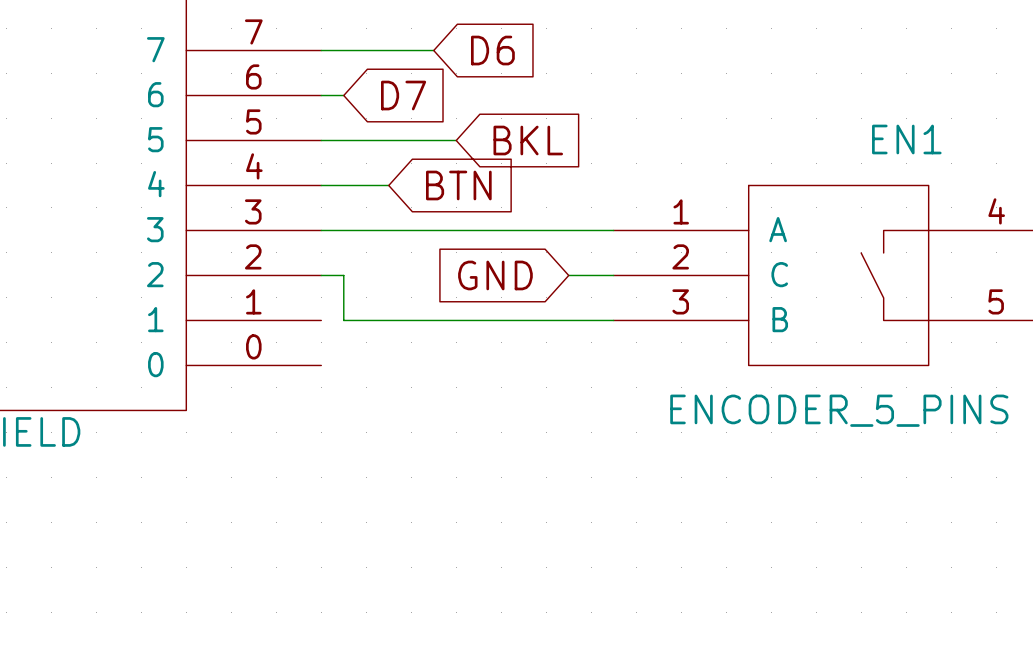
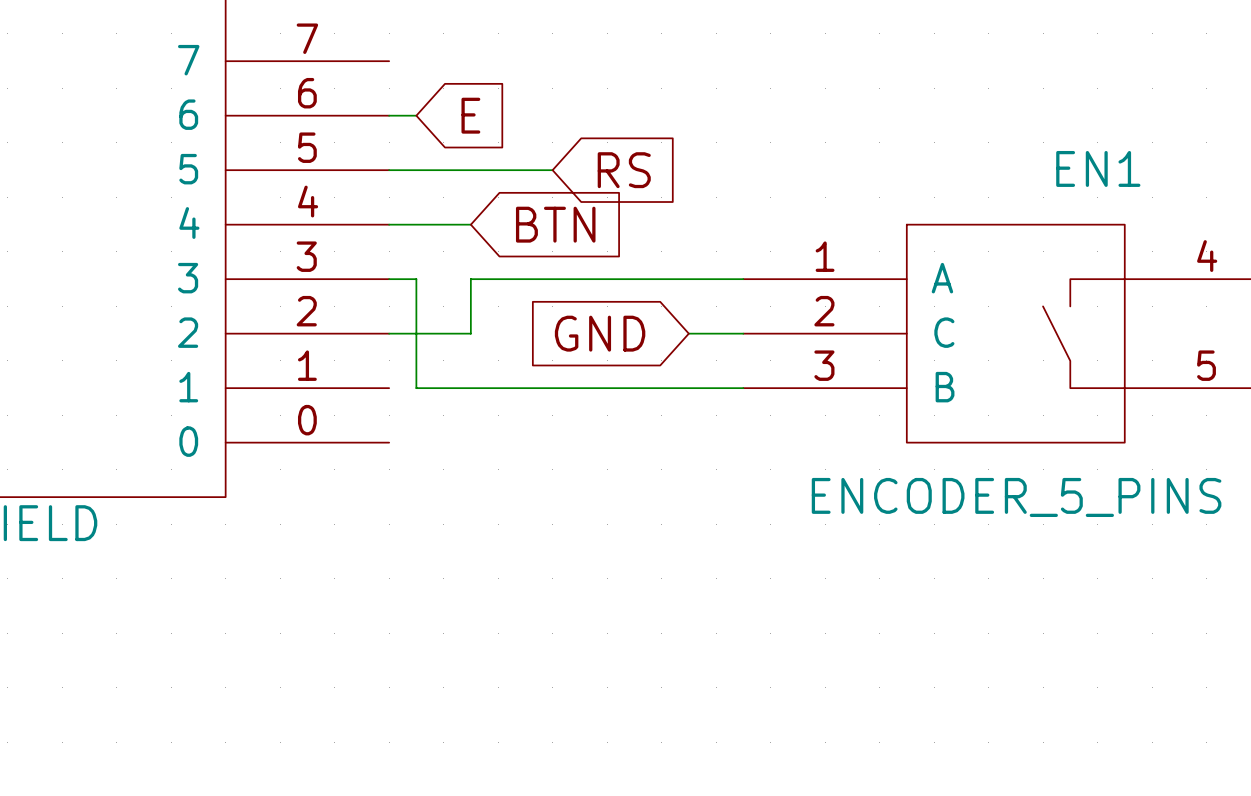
wire: (321, 50) (433, 50) -> none
global label: D6 (492, 50) -> none
global label: D7 (403, 95) -> E (470, 115)
global label: BKL (528, 140) -> RS (624, 170)
wire: (343, 230) (388, 230) -> (416, 279) (416, 333) (470, 333) (470, 279)

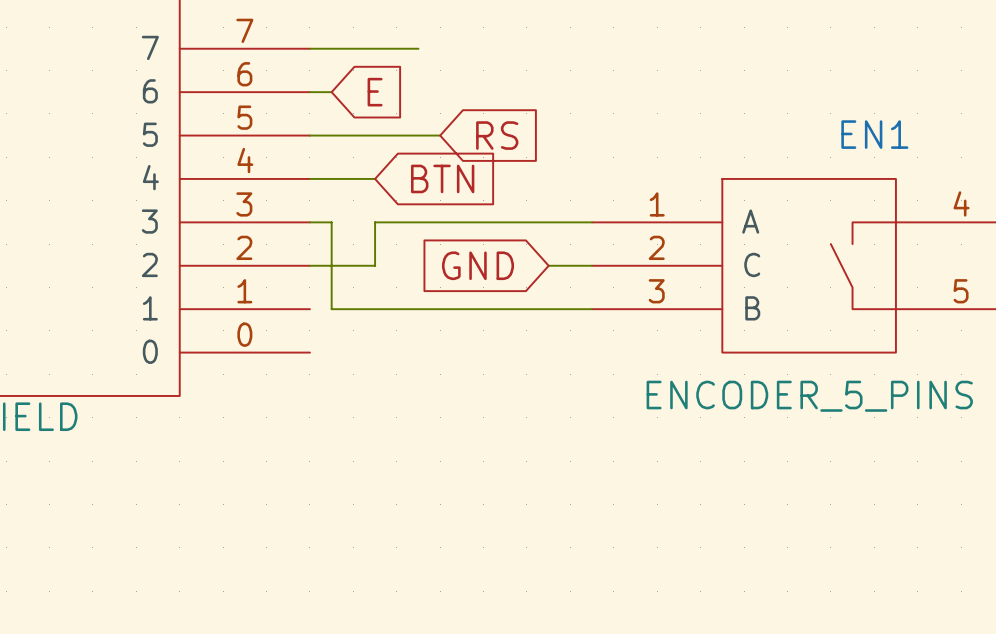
wire: none -> (309, 48) (418, 48)

